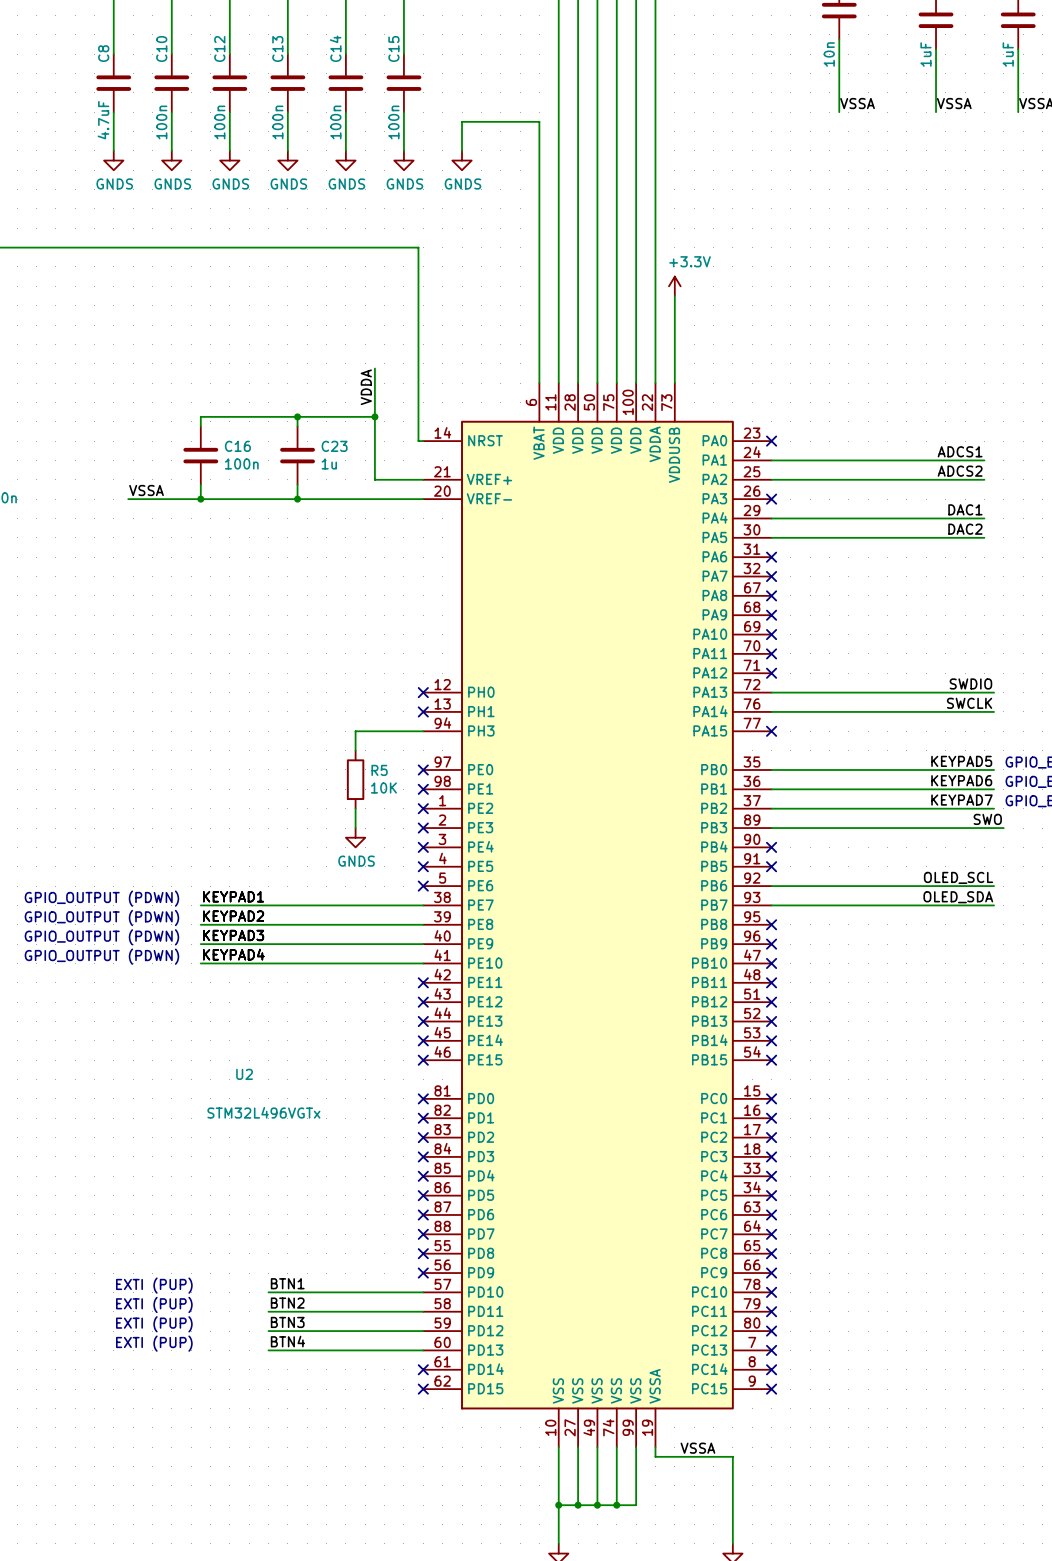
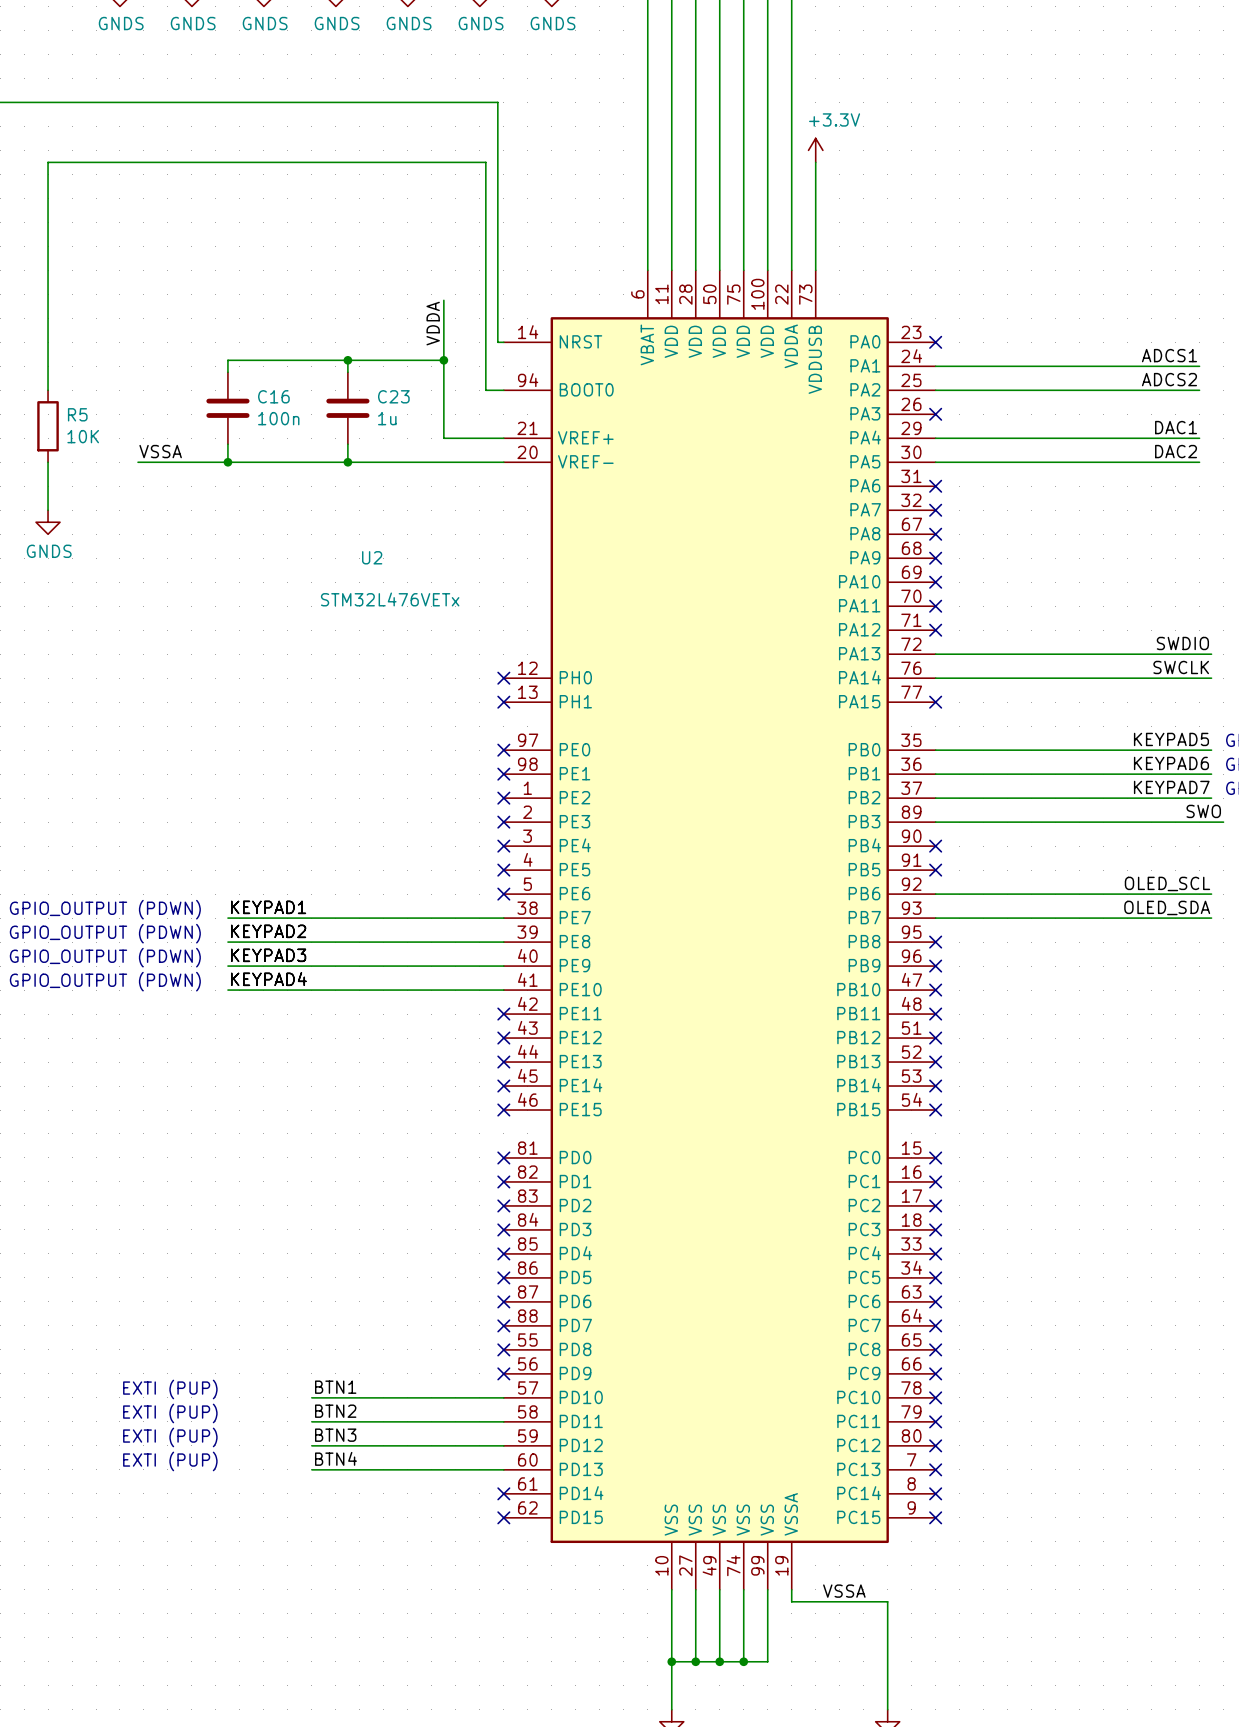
wire: (374, 368) (374, 407) -> none
U2 symbol: [423, 383, 772, 1448] -> [503, 270, 936, 1590]
label position: VDDA (366, 387) -> VDDA (433, 323)
junction: (297, 416) -> none
wire: (374, 416) (200, 416) (200, 426) -> (443, 360) (227, 360) (227, 372)
junction position: (374, 416) -> (443, 360)
C16 position: (200, 455) -> (227, 408)
C23 position: (297, 455) -> (347, 408)
junction: none -> (347, 360)
wire: none -> (48, 390) (48, 162) (485, 162) (485, 390)
wire: (374, 479) (408, 479) -> (443, 390) (443, 438) (503, 438)
wire: (200, 484) (200, 499) -> (227, 444) (227, 462)
wire: (297, 484) (297, 499) -> (347, 444) (347, 462)
label position: VSSA (146, 490) -> VSSA (160, 451)
wire: (128, 499) (423, 499) -> (137, 462) (503, 462)
junction position: (200, 499) -> (227, 462)
junction: (297, 499) -> none
wire: none -> (48, 462) (48, 510)
junction: none -> (347, 462)
power symbol: none -> GNDS (48, 522)
no-connect mark position: (423, 692) -> (503, 702)
wire: (423, 731) (355, 731) (355, 750) -> none
R5 position: (355, 779) -> (48, 426)
wire: (355, 808) (355, 828) -> none
power symbol: GNDS (355, 837) -> none
U2 name position: U2 (244, 1074) -> U2 (372, 557)
U2 value: STM32L496VGTx (263, 1112) -> STM32L476VETx (390, 599)

